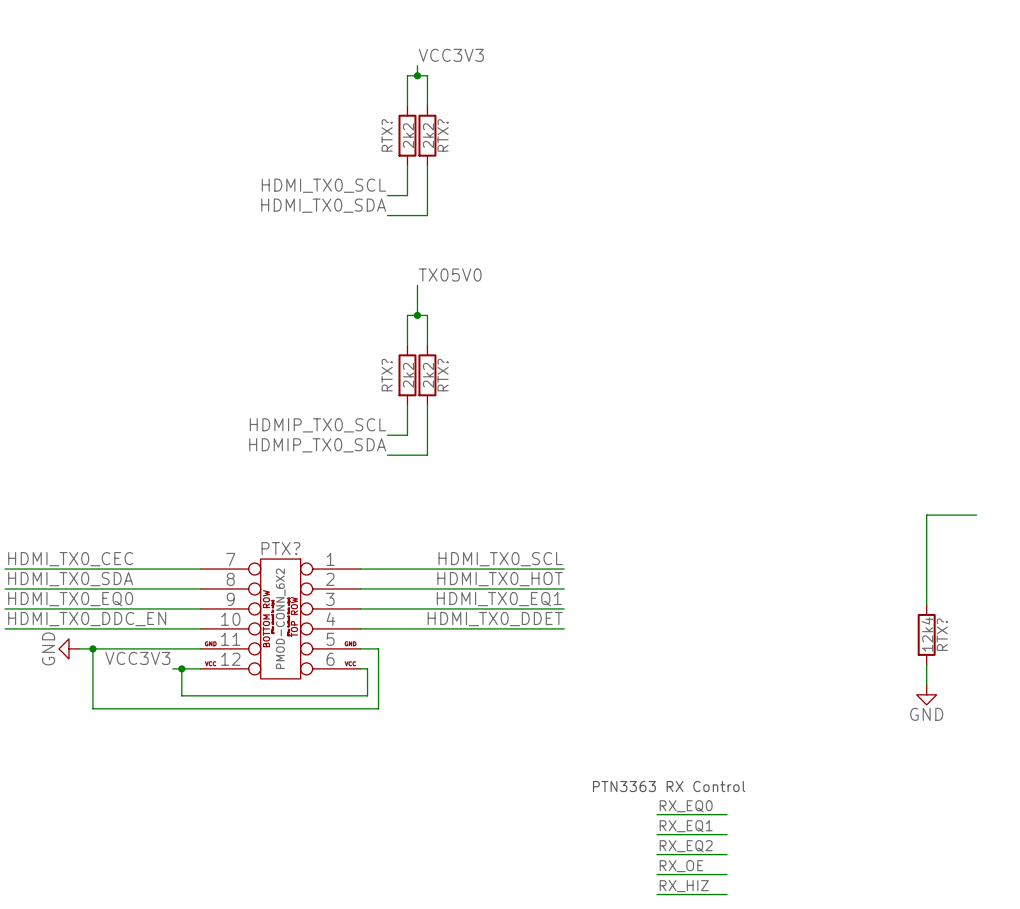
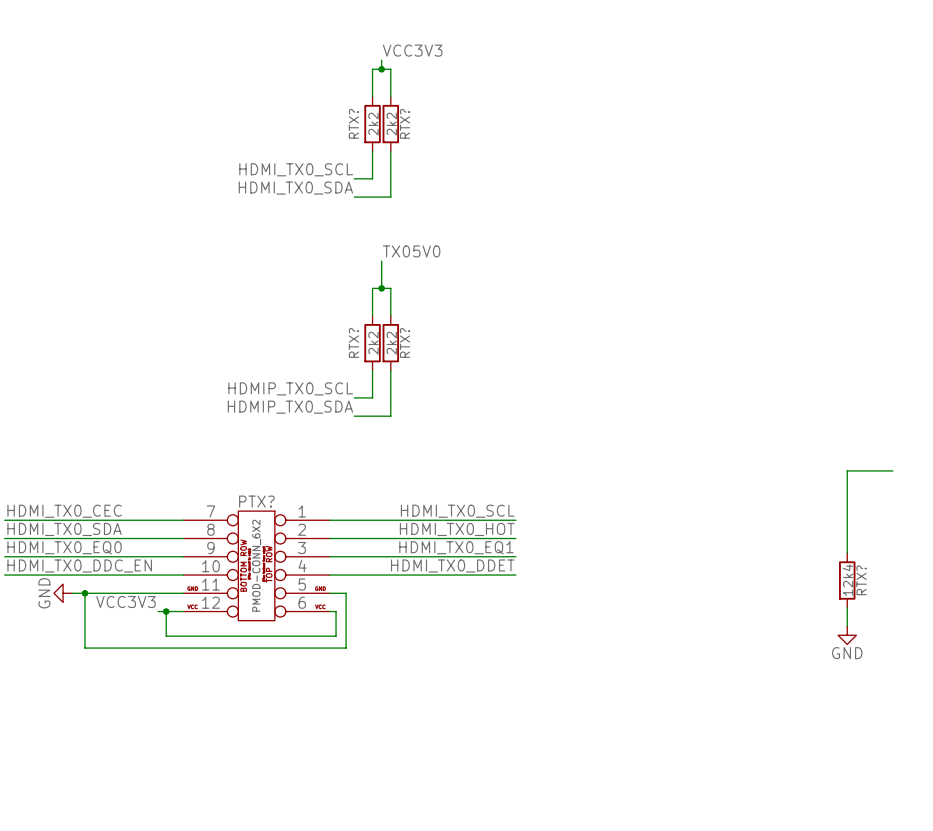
text: PTN3363 RX Control (669, 786) -> none
label: RX_EQ0 (686, 806) -> none
wire: (657, 814) (726, 814) -> none
label: RX_EQ1 (686, 826) -> none
wire: (657, 834) (726, 834) -> none
label: RX_EQ2 (686, 846) -> none
wire: (657, 854) (726, 854) -> none
label: RX_OE (681, 866) -> none
wire: (657, 874) (726, 874) -> none
label: RX_HIZ (684, 886) -> none
wire: (657, 894) (726, 894) -> none

